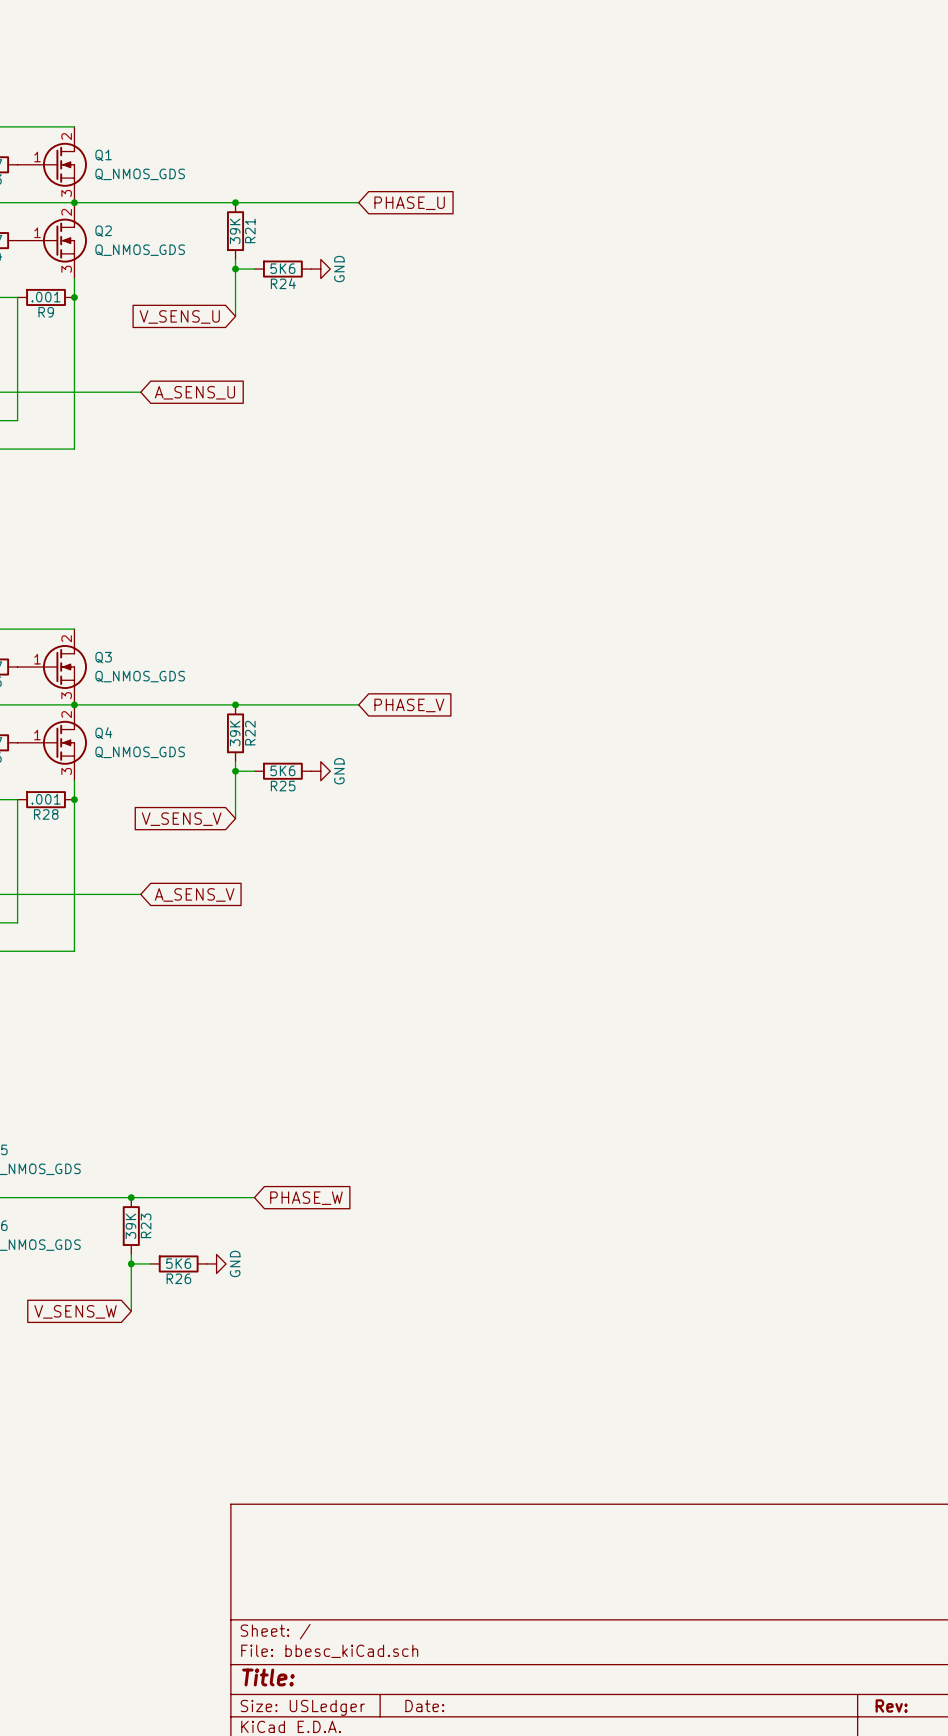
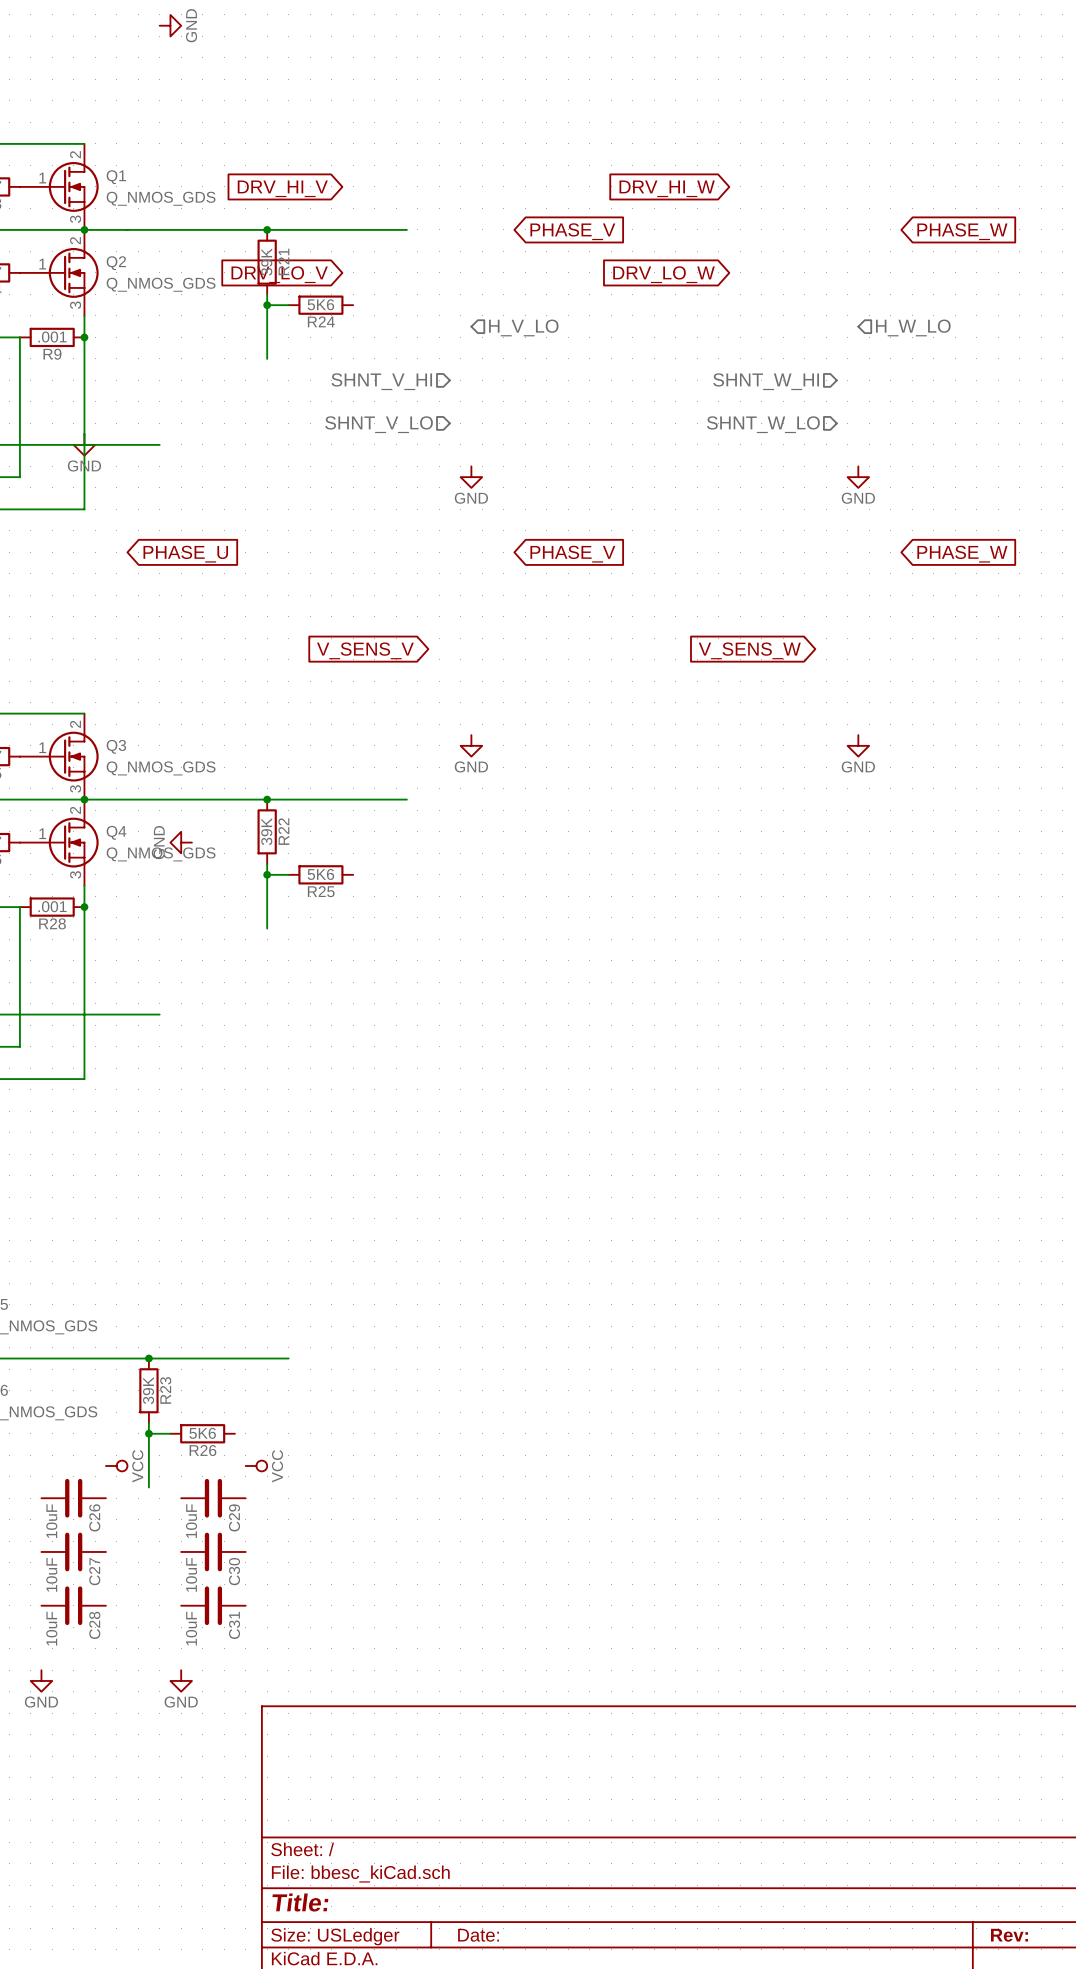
power symbol: none -> GND (170, 25)
global label: none -> DRV_HI_V (282, 188)
global label: none -> DRV_HI_W (667, 188)
global label: PHASE_U (409, 203) -> PHASE_V (572, 231)
global label: none -> PHASE_W (962, 231)
global label: none -> DRV_LO_V (279, 274)
global label: none -> DRV_LO_W (664, 274)
power symbol: GND (320, 269) -> none
hierarchical label: none -> H_V_LO (523, 327)
hierarchical label: none -> H_W_LO (913, 327)
global label: V_SENS_U (179, 316) -> none
hierarchical label: none -> SHNT_V_HI (381, 381)
hierarchical label: none -> SHNT_W_HI (766, 381)
hierarchical label: none -> SHNT_V_LO (379, 424)
hierarchical label: none -> SHNT_W_LO (763, 424)
power symbol: none -> GND (84, 444)
global label: A_SENS_U (194, 392) -> none
power symbol: none -> GND (471, 477)
power symbol: none -> GND (858, 477)
global label: none -> PHASE_U (185, 554)
global label: none -> PHASE_V (572, 554)
global label: none -> PHASE_W (962, 554)
global label: none -> V_SENS_V (365, 650)
global label: none -> V_SENS_W (749, 650)
power symbol: none -> GND (471, 745)
power symbol: none -> GND (858, 745)
global label: PHASE_V (409, 705) -> none
power symbol: none -> GND (181, 842)
power symbol: GND (320, 771) -> none
global label: V_SENS_V (181, 819) -> none
global label: A_SENS_V (194, 894) -> none
global label: PHASE_W (306, 1198) -> none
power symbol: GND (216, 1263) -> none
power symbol: none -> VCC (116, 1466)
power symbol: none -> VCC (256, 1466)
global label: V_SENS_W (75, 1311) -> none
C26: none -> 10uF (73, 1498)
C29: none -> 10uF (213, 1498)
C27: none -> 10uF (73, 1551)
C30: none -> 10uF (213, 1551)
C28: none -> 10uF (73, 1605)
C31: none -> 10uF (213, 1605)
power symbol: none -> GND (41, 1680)
power symbol: none -> GND (181, 1680)

